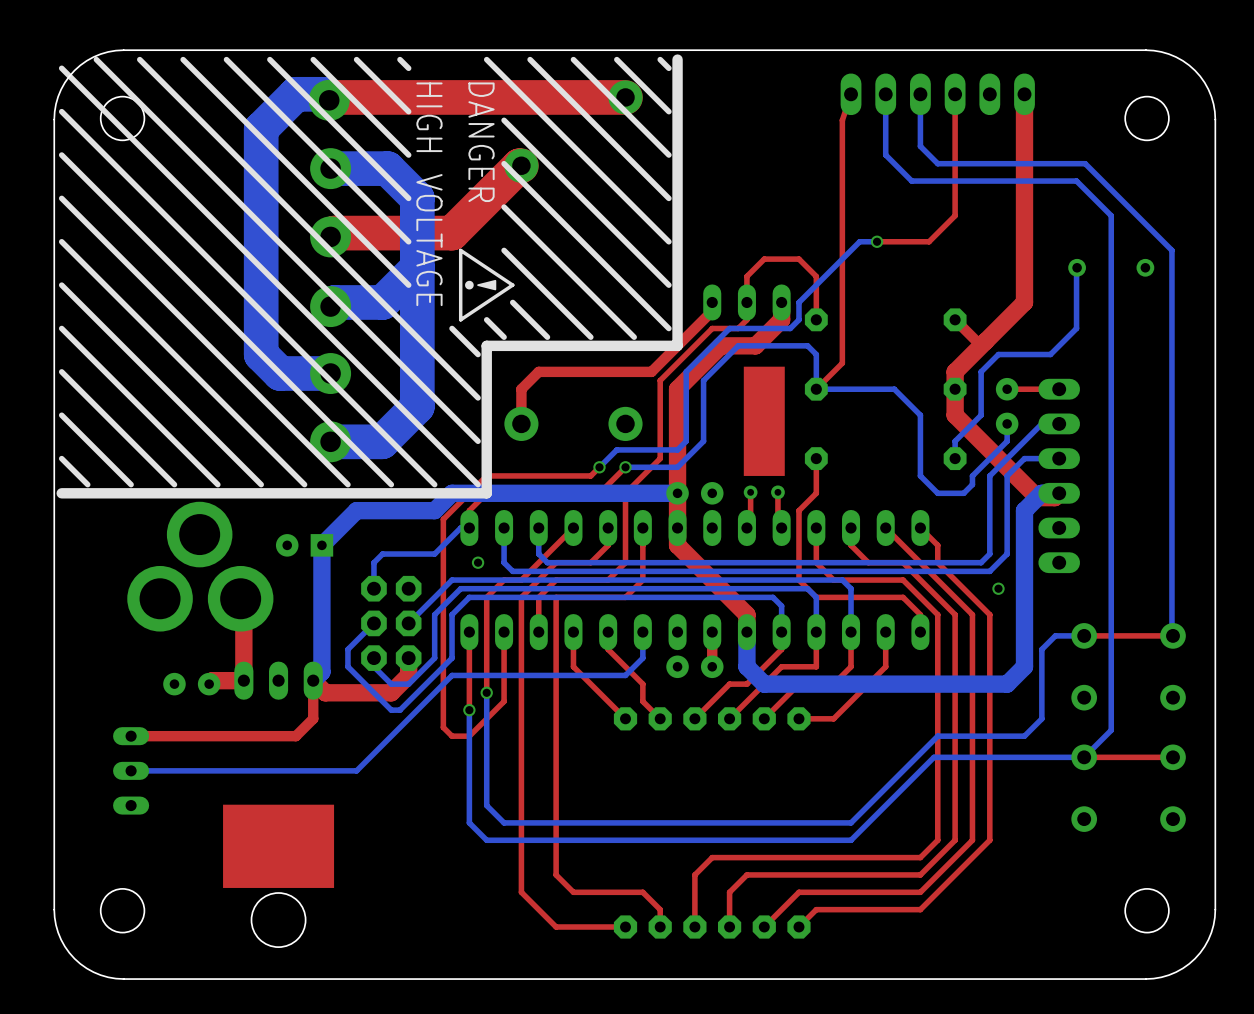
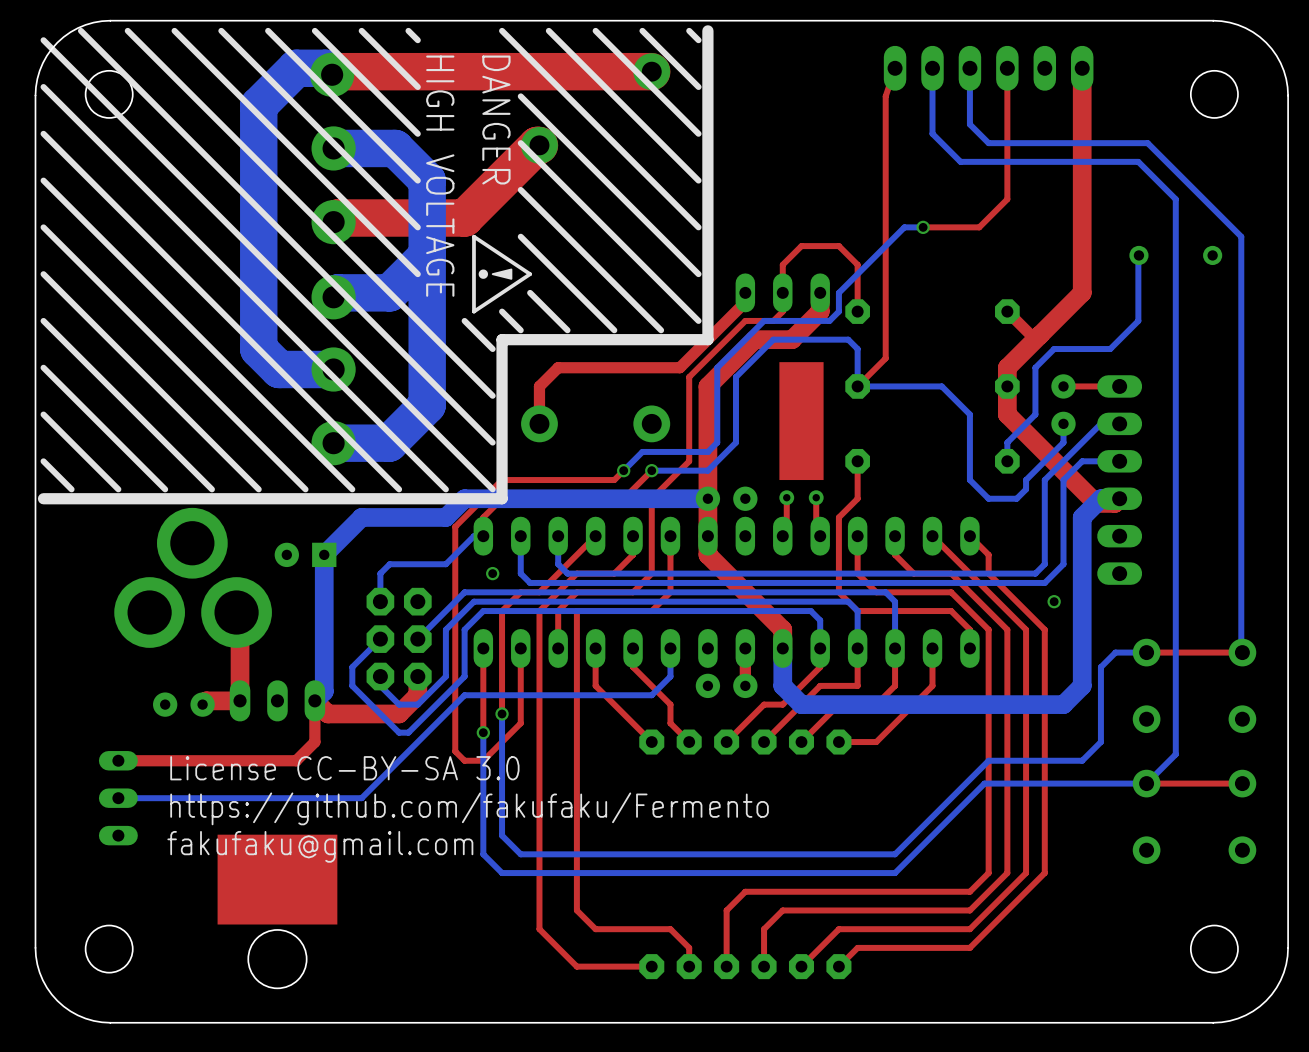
text: none -> License CC-BY-SA 3.0 (344, 768)
text: none -> https://github.com/fakufaku/Fermento (469, 808)
text: none -> fakufaku@gmail.com (320, 846)

